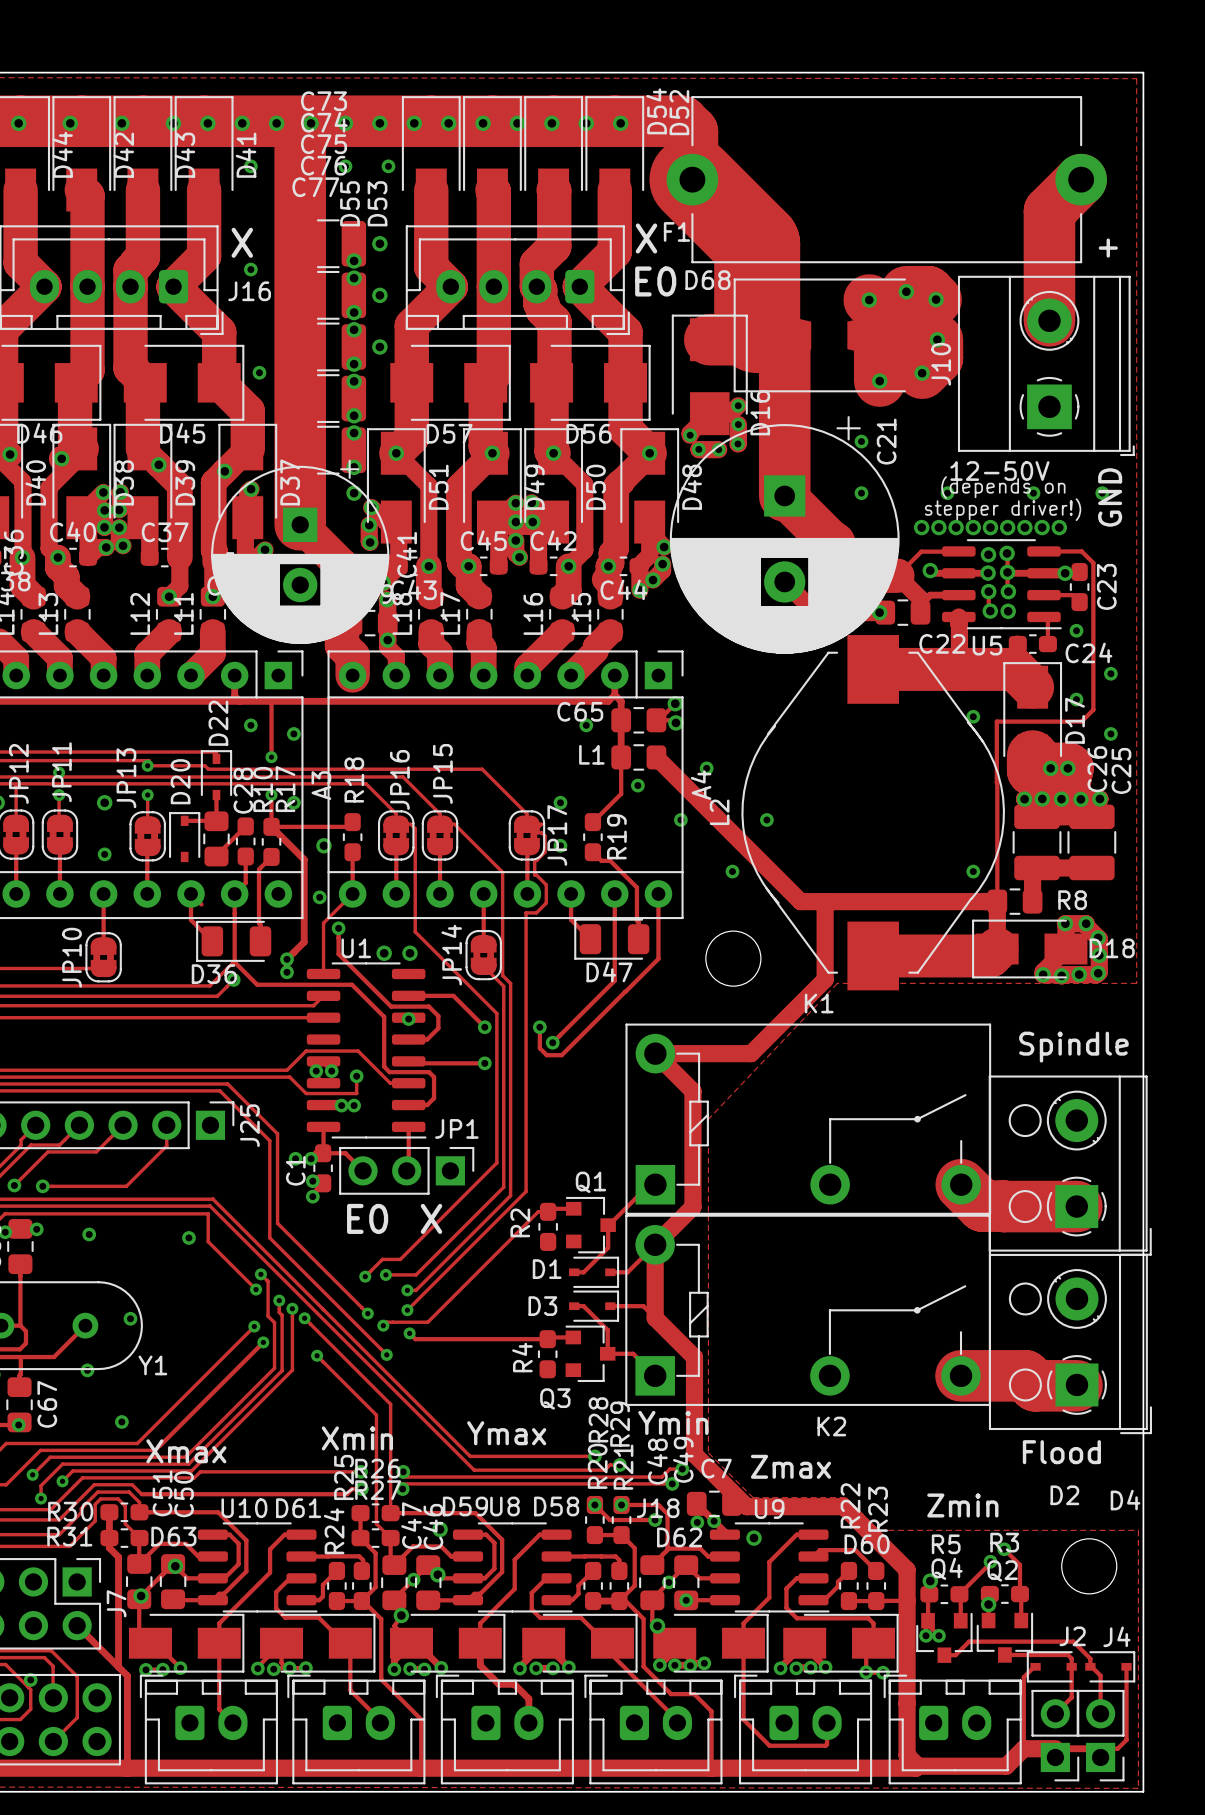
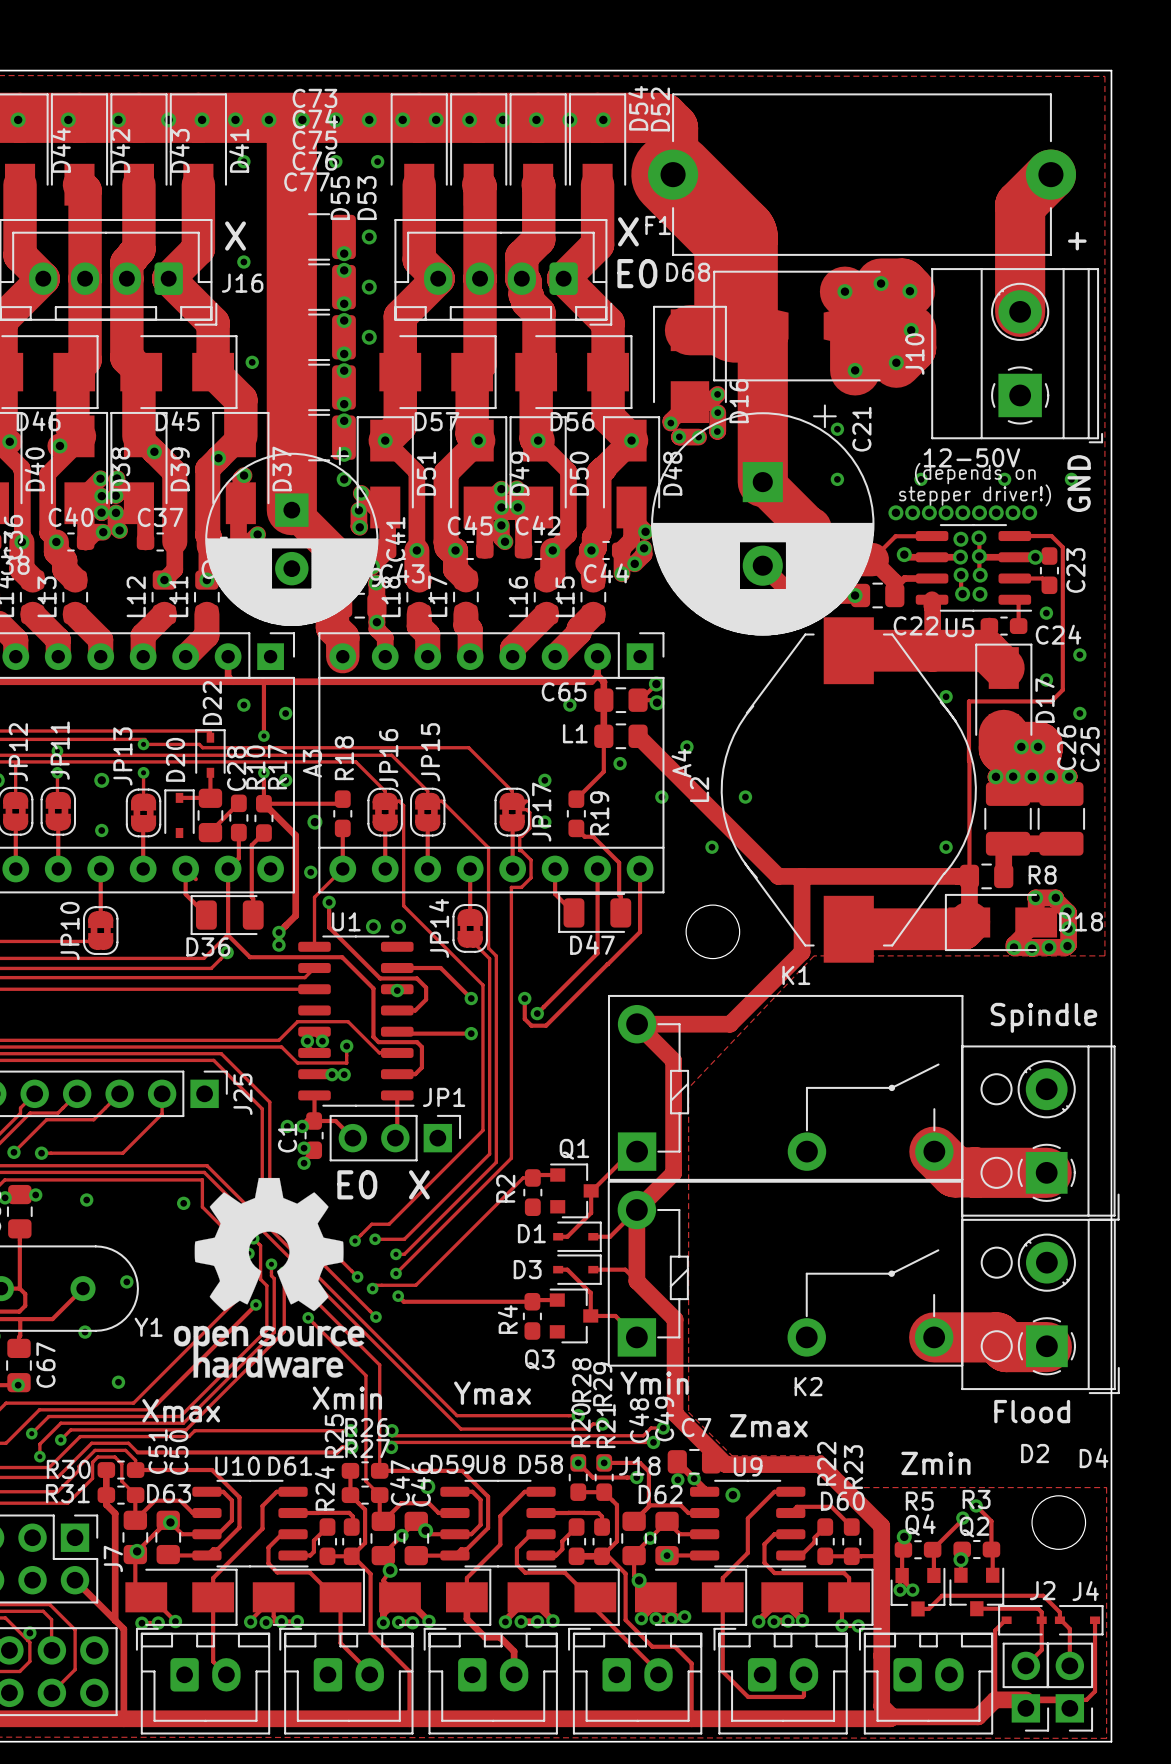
drawing: none -> [173, 1177, 365, 1378]

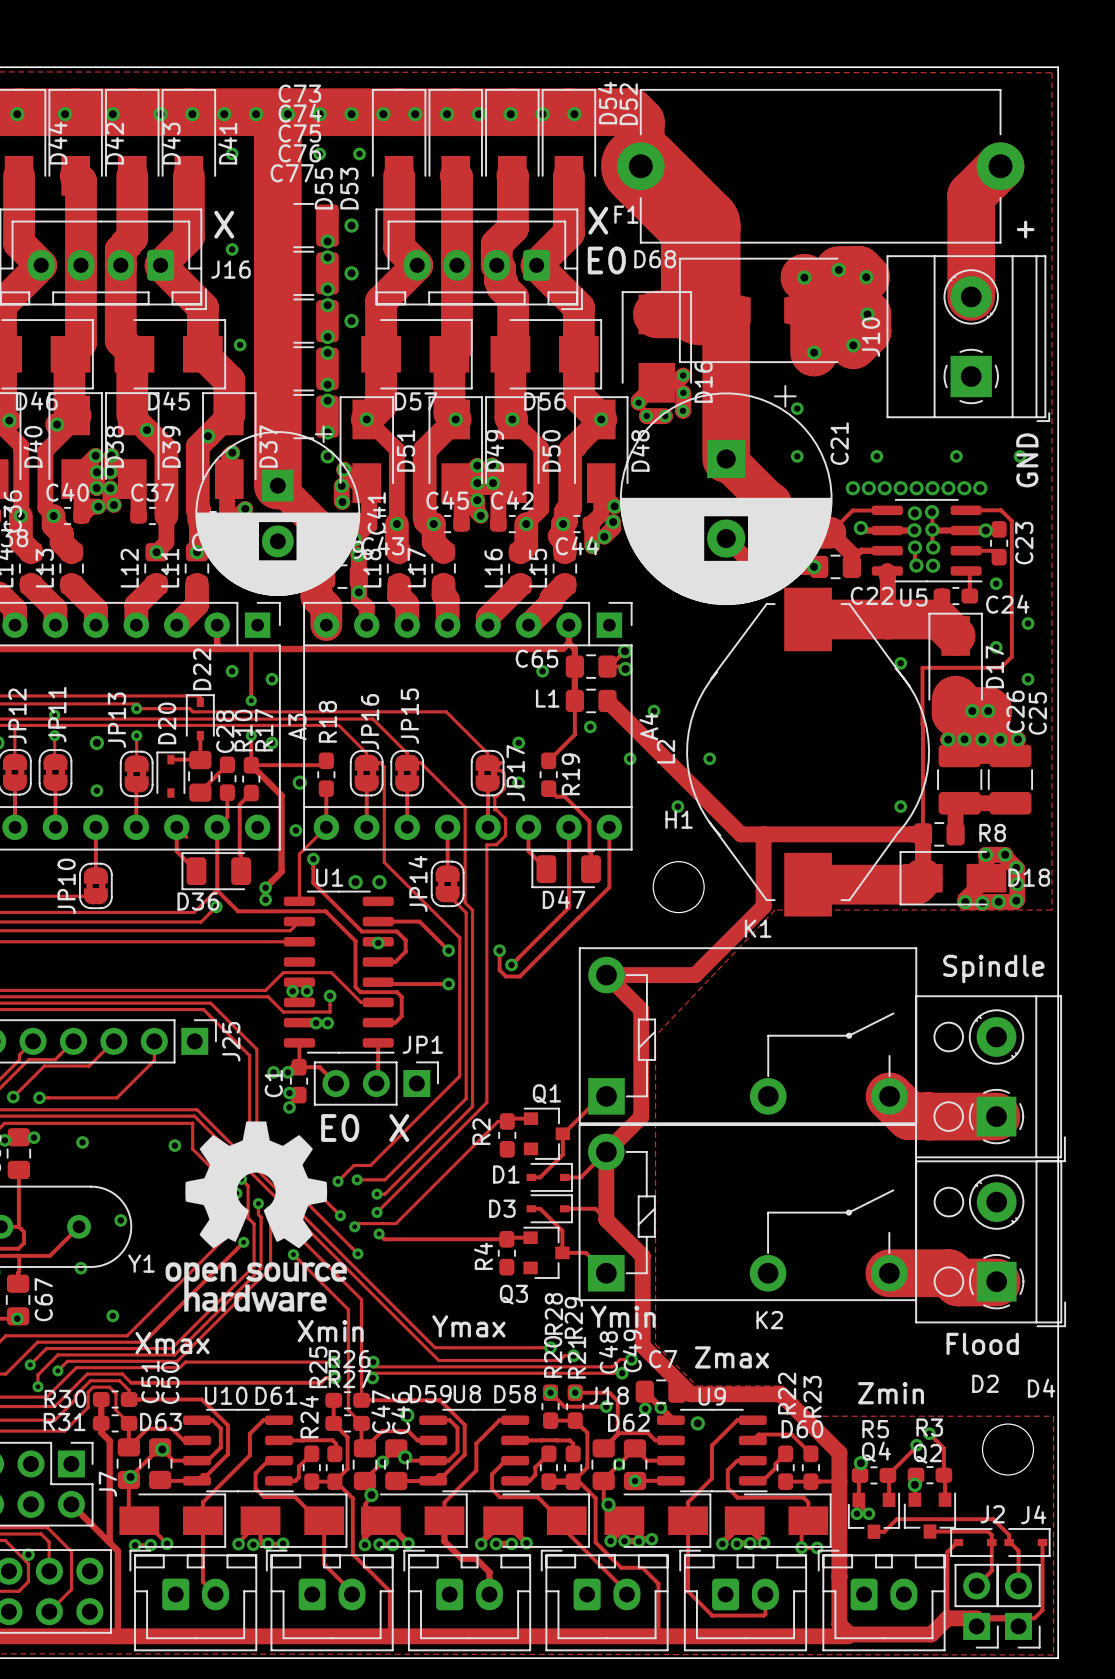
C21 name position: C21 (861, 429) -> C21 (839, 443)
text: 12-50V (971, 457) -> none
text: (depends on (975, 473) -> none
text: stepper driver!) (975, 495) -> none
H1 name: none -> H1 (679, 819)

